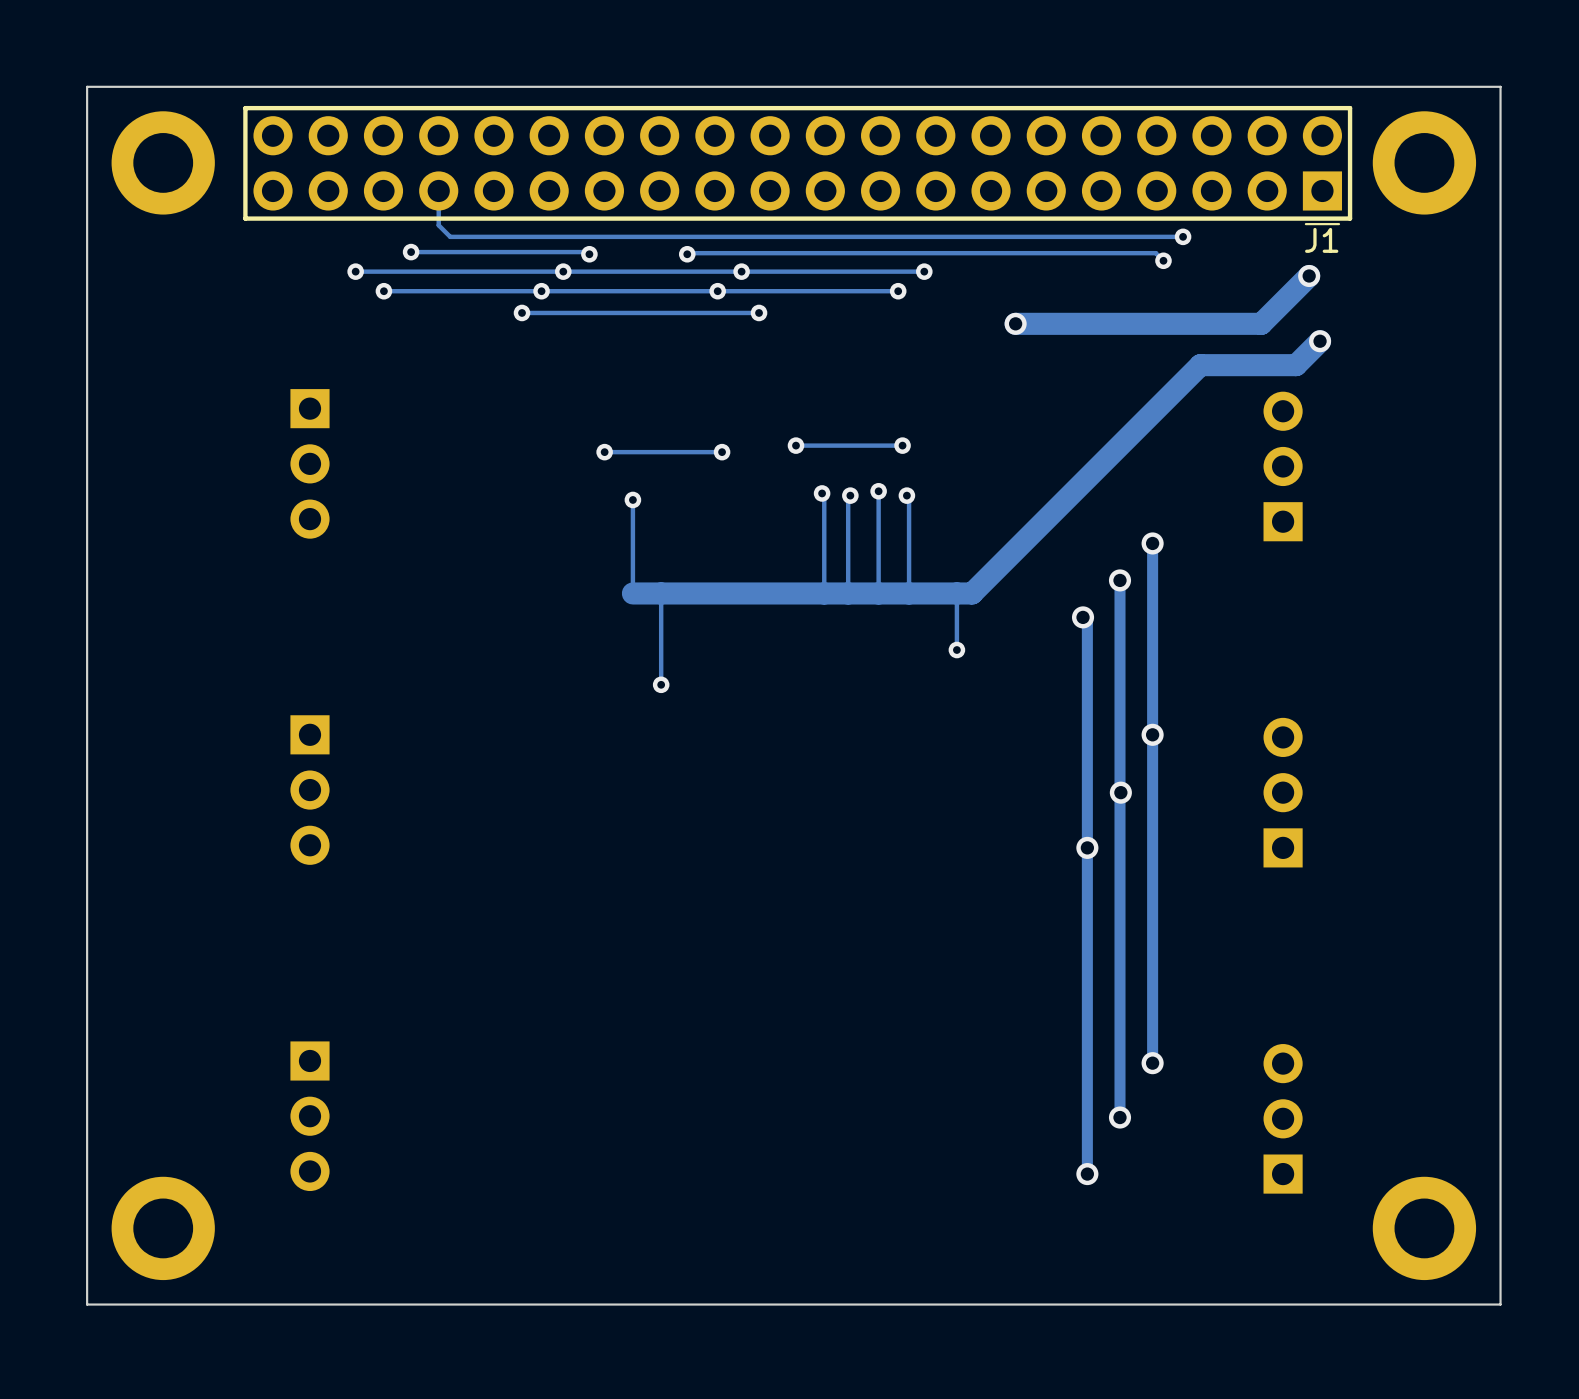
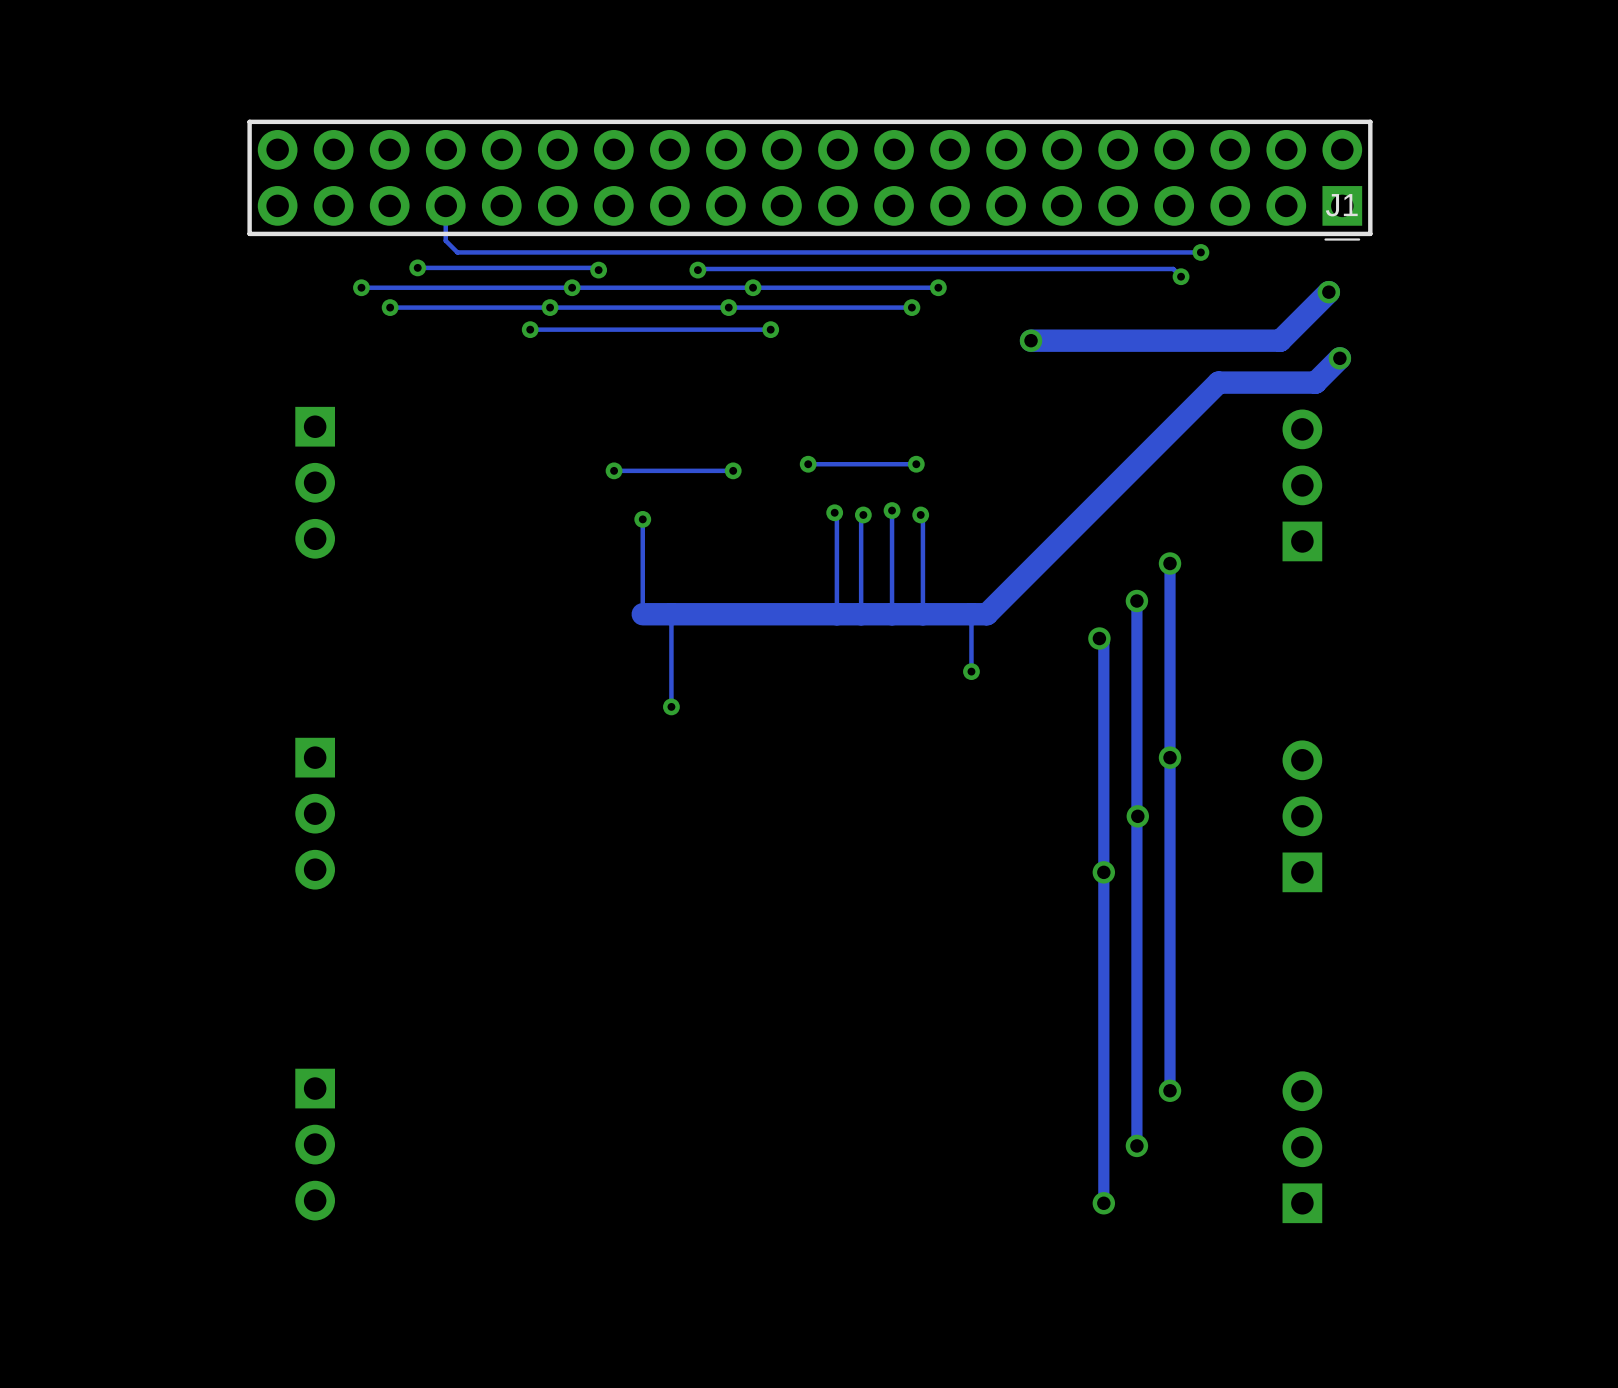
board edge: (1500, 86) (1500, 1304) (87, 1304) (87, 86) (1500, 86) -> none
part: (163, 162) -> none
part: (1424, 162) -> none
J1 name position: J1 (1321, 240) -> J1 (1341, 205)
part: (163, 1228) -> none
part: (1424, 1228) -> none

